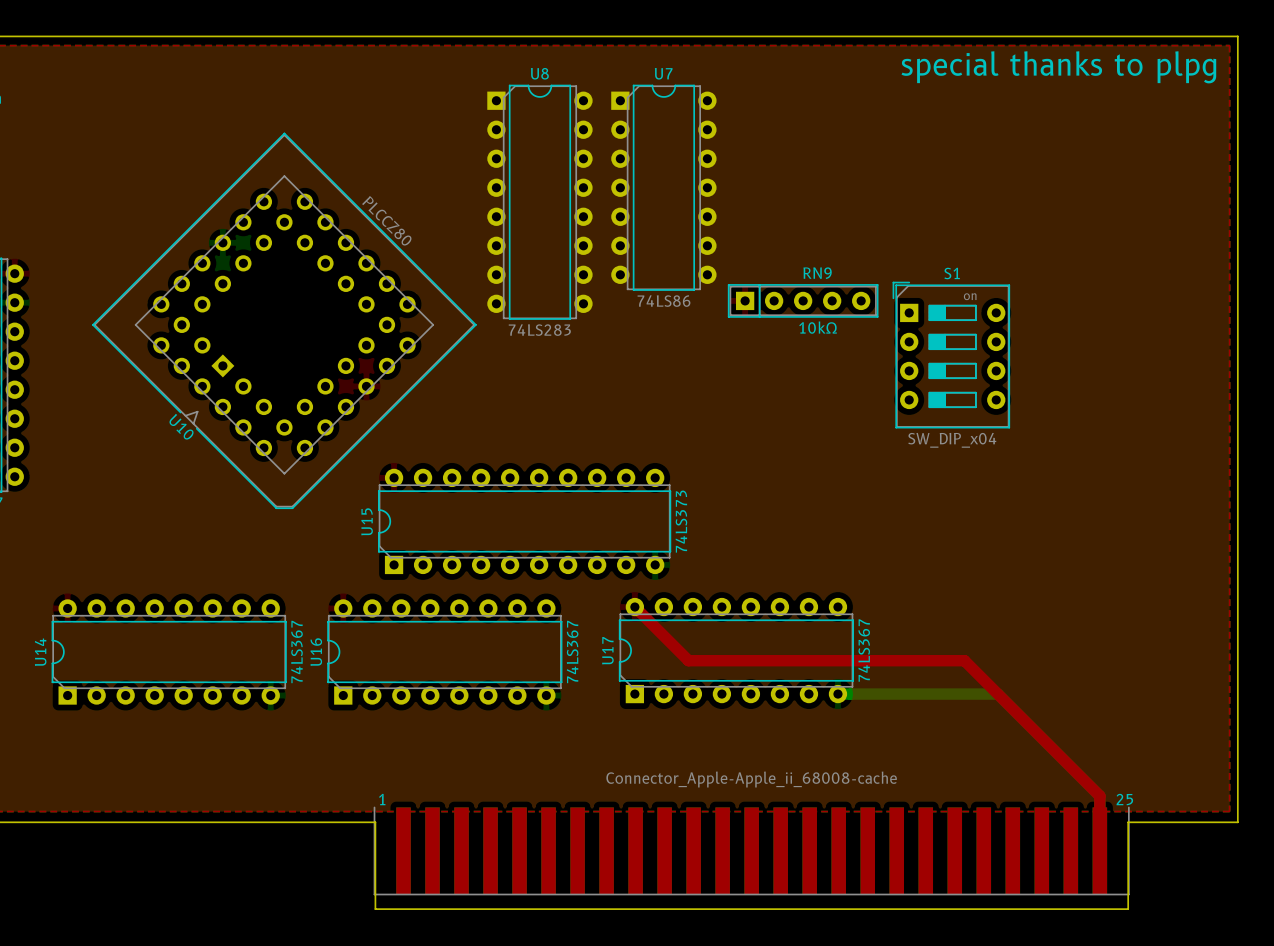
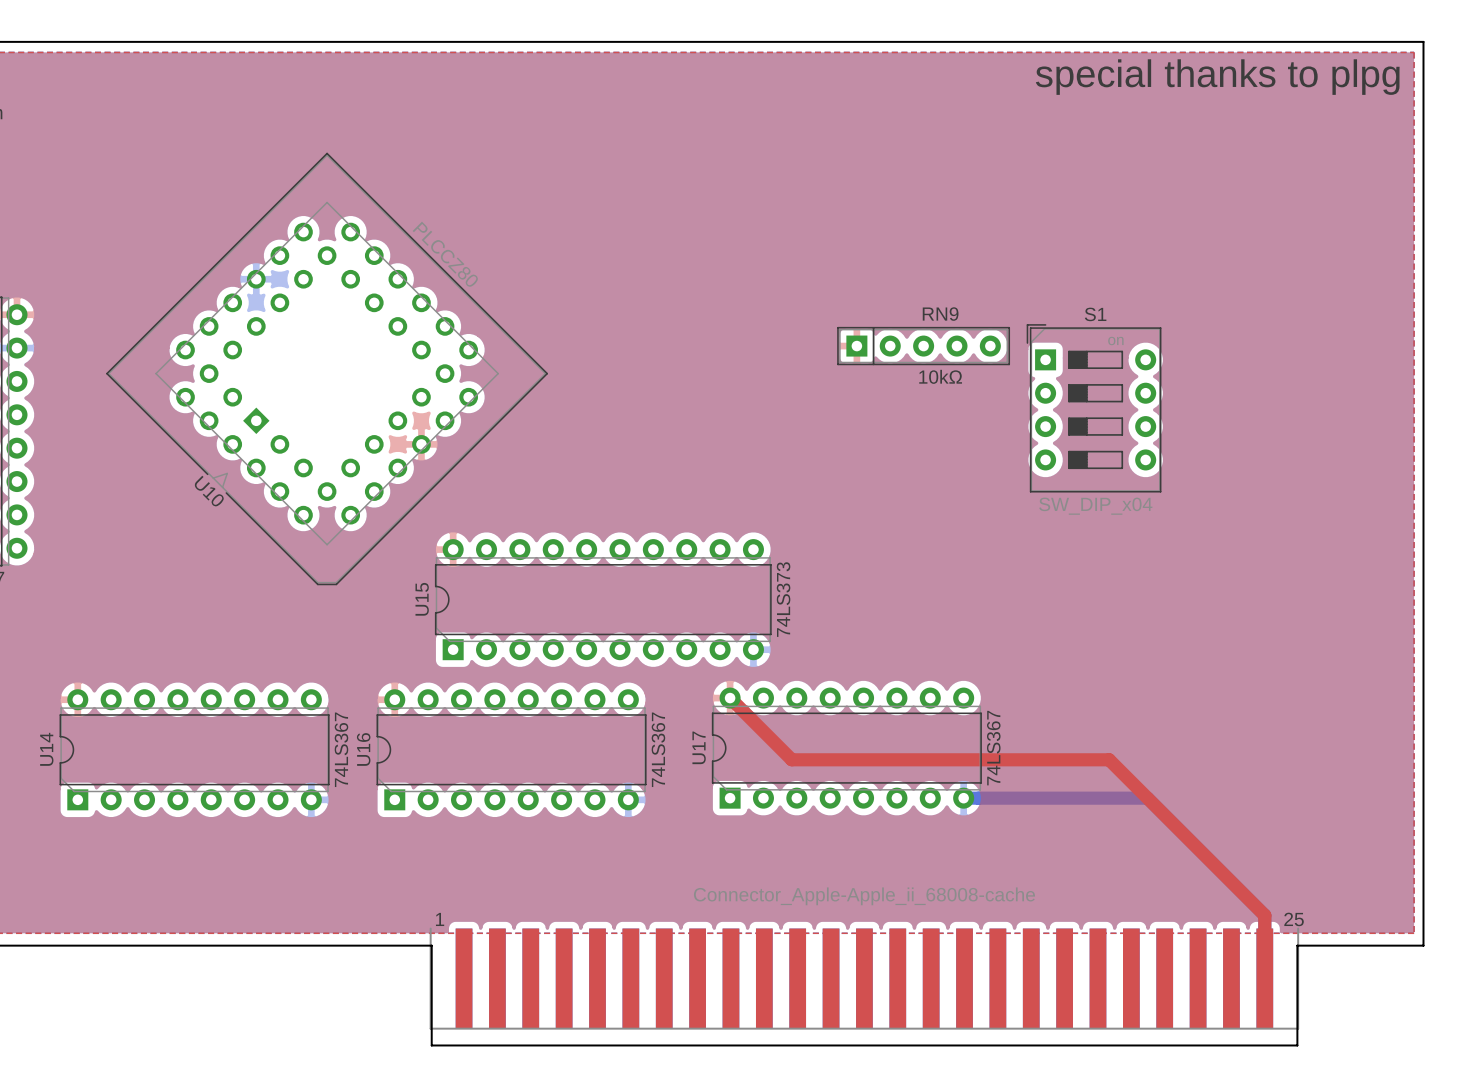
U7: 74LS86 (663, 187) -> none
U8: 74LS283 (539, 202) -> none

